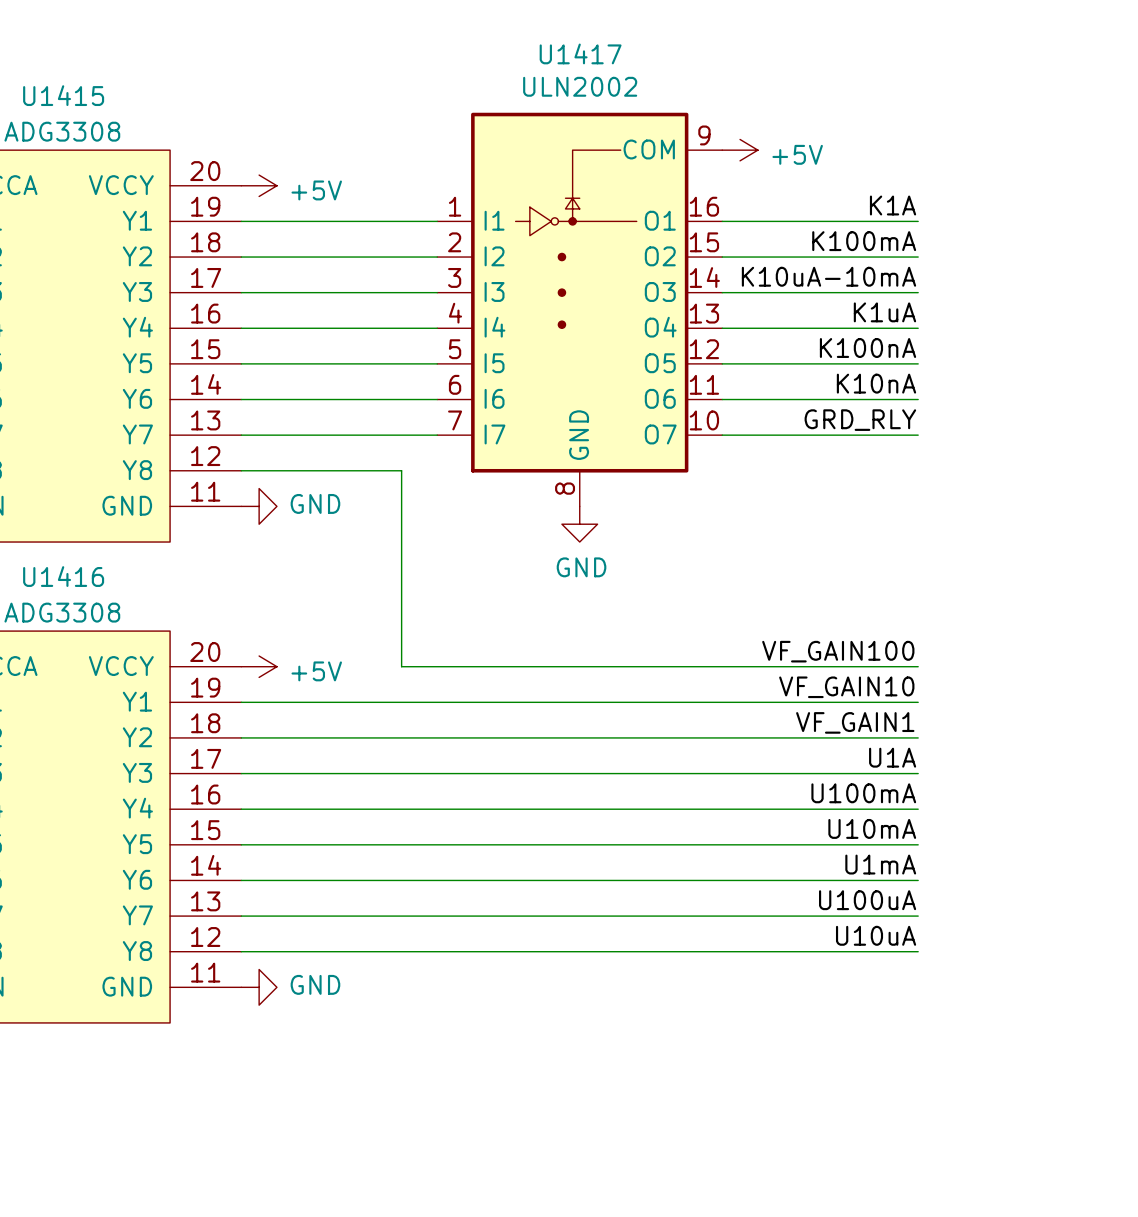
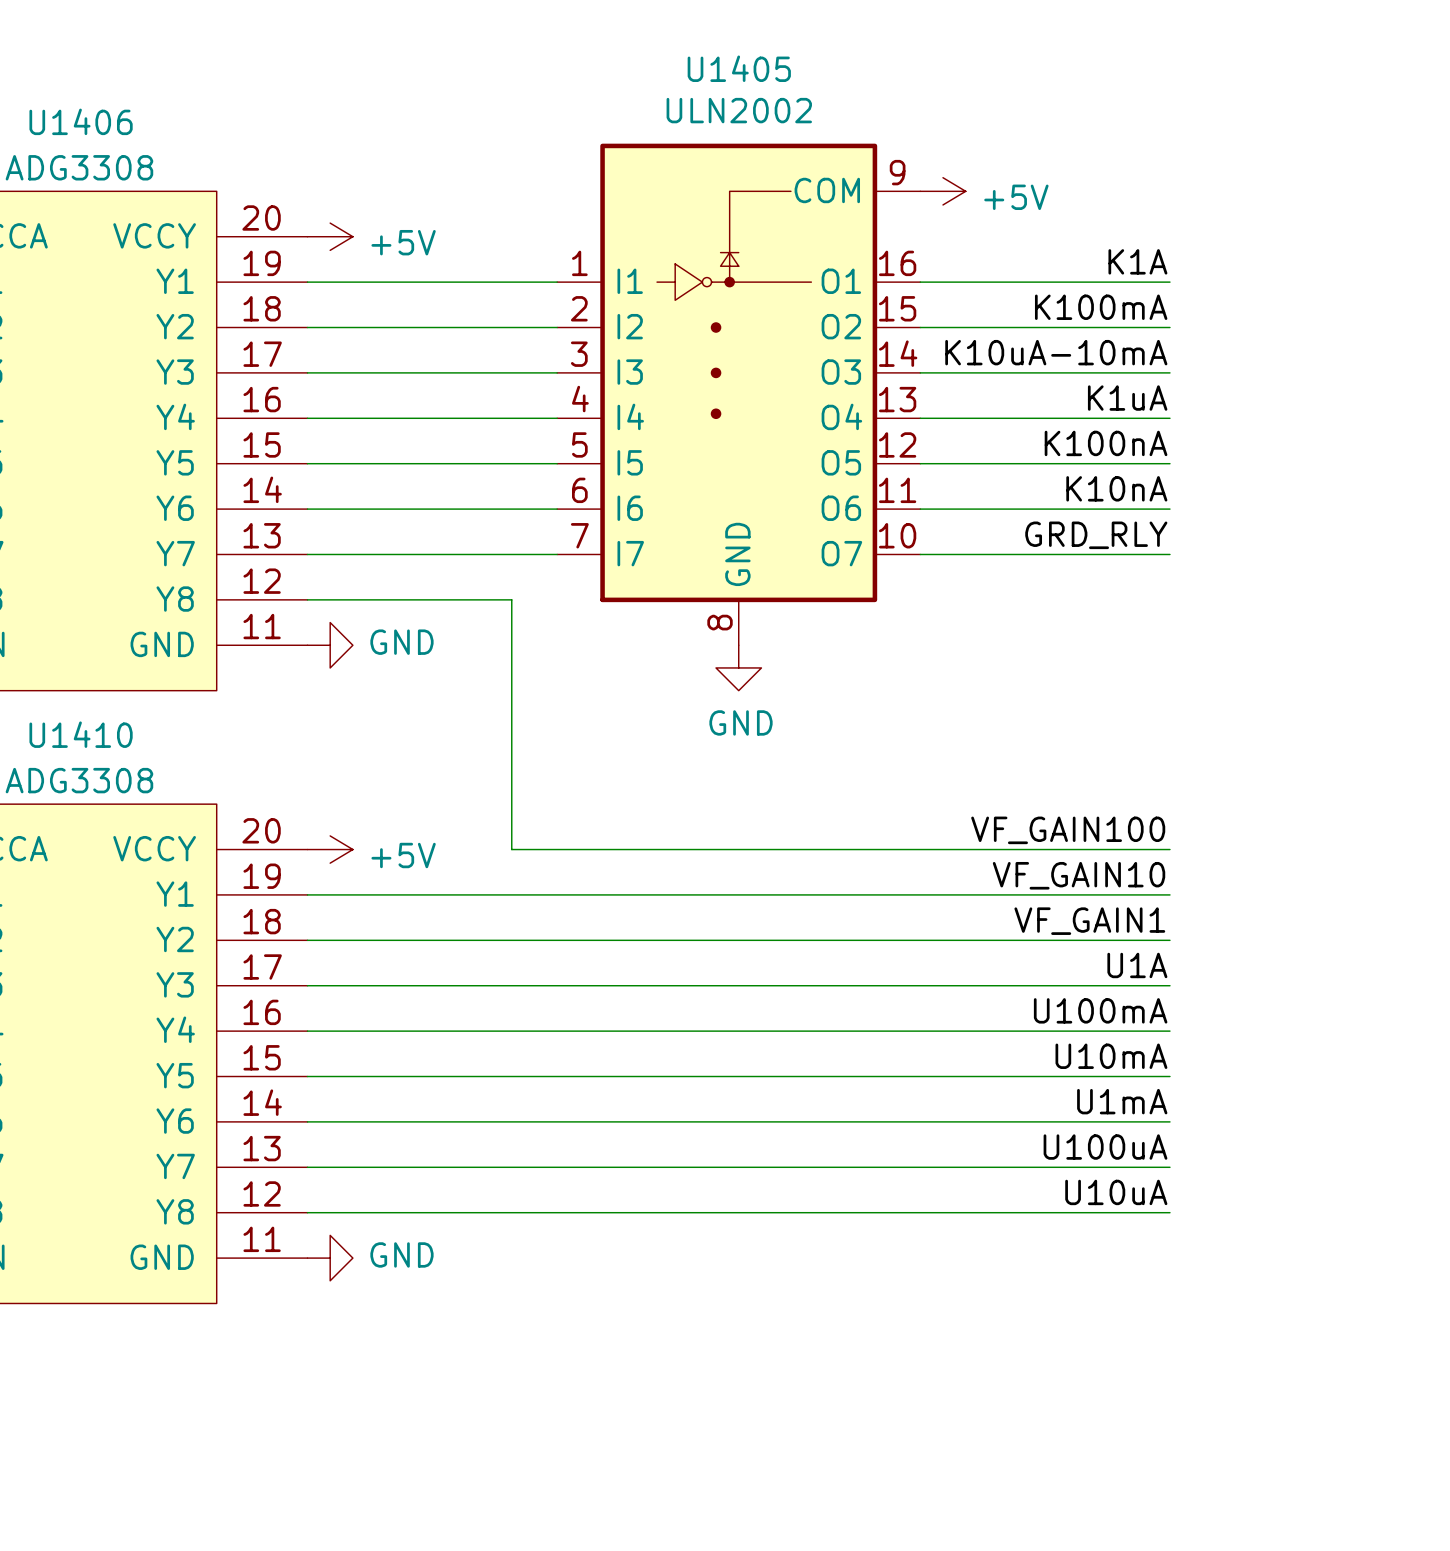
U1417 name: U1417 (580, 53) -> U1405 (739, 68)
U1415 name: U1415 (63, 95) -> U1406 (81, 121)
U1416 name: U1416 (63, 576) -> U1410 (81, 734)

